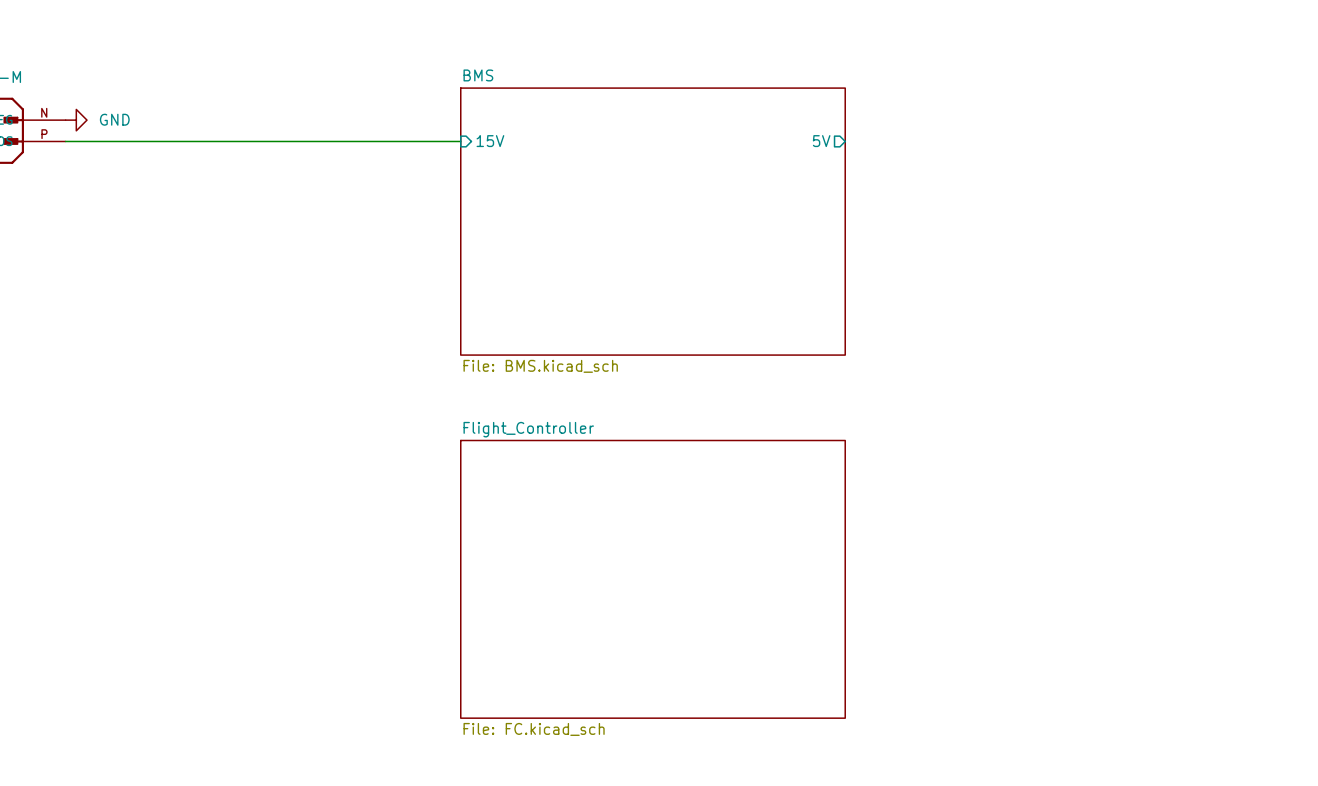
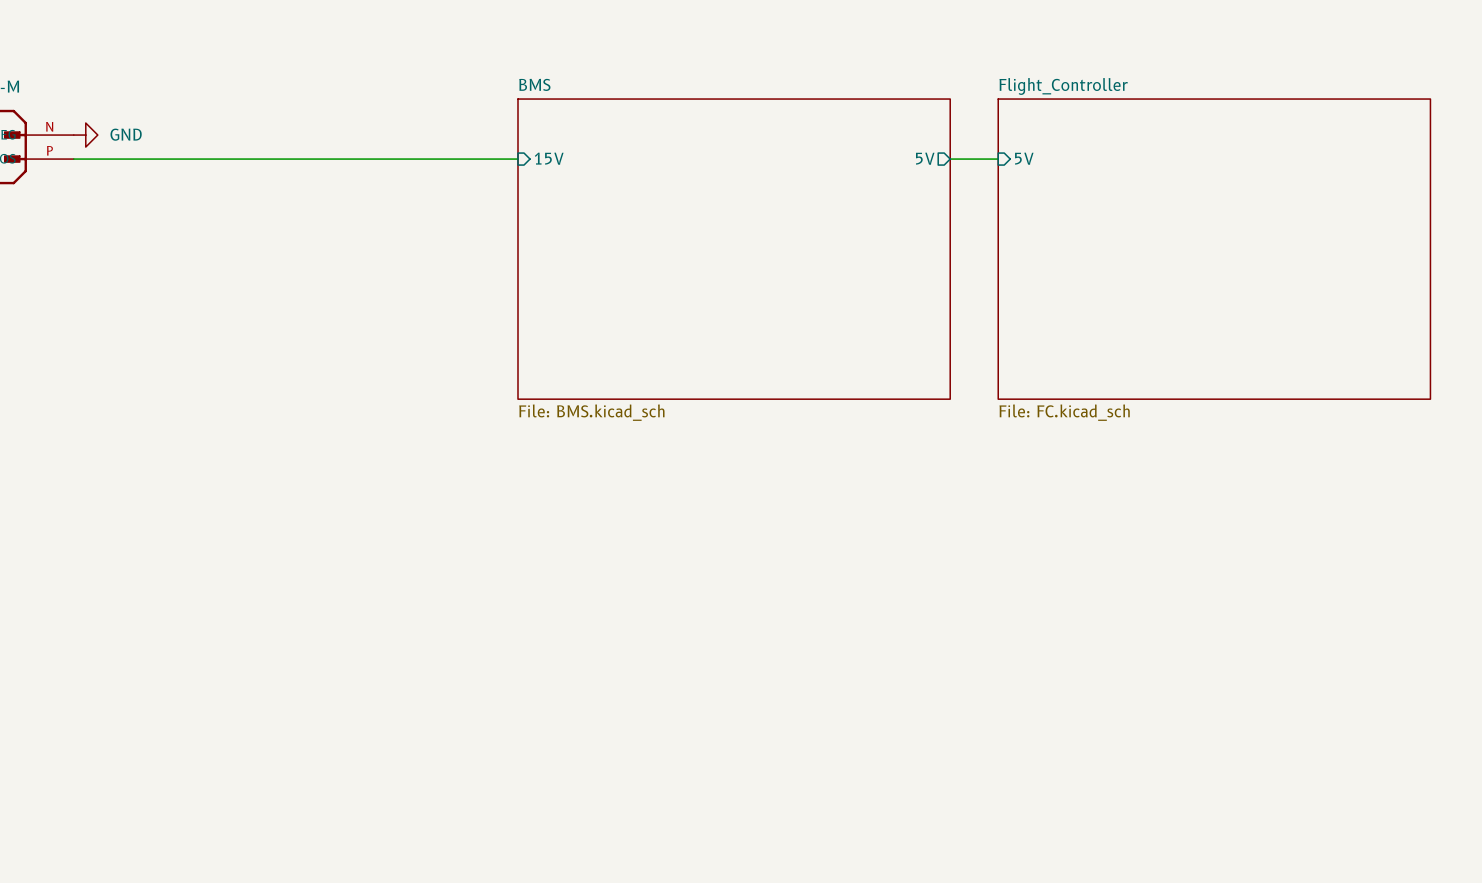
wire: none -> (950, 159) (998, 159)
sheet pin: none -> 5V (1024, 158)
sheet Flight_Controller: none -> File: FC.kicad_sch (1214, 249)
sheet Flight_Controller: File: FC.kicad_sch (652, 579) -> none

